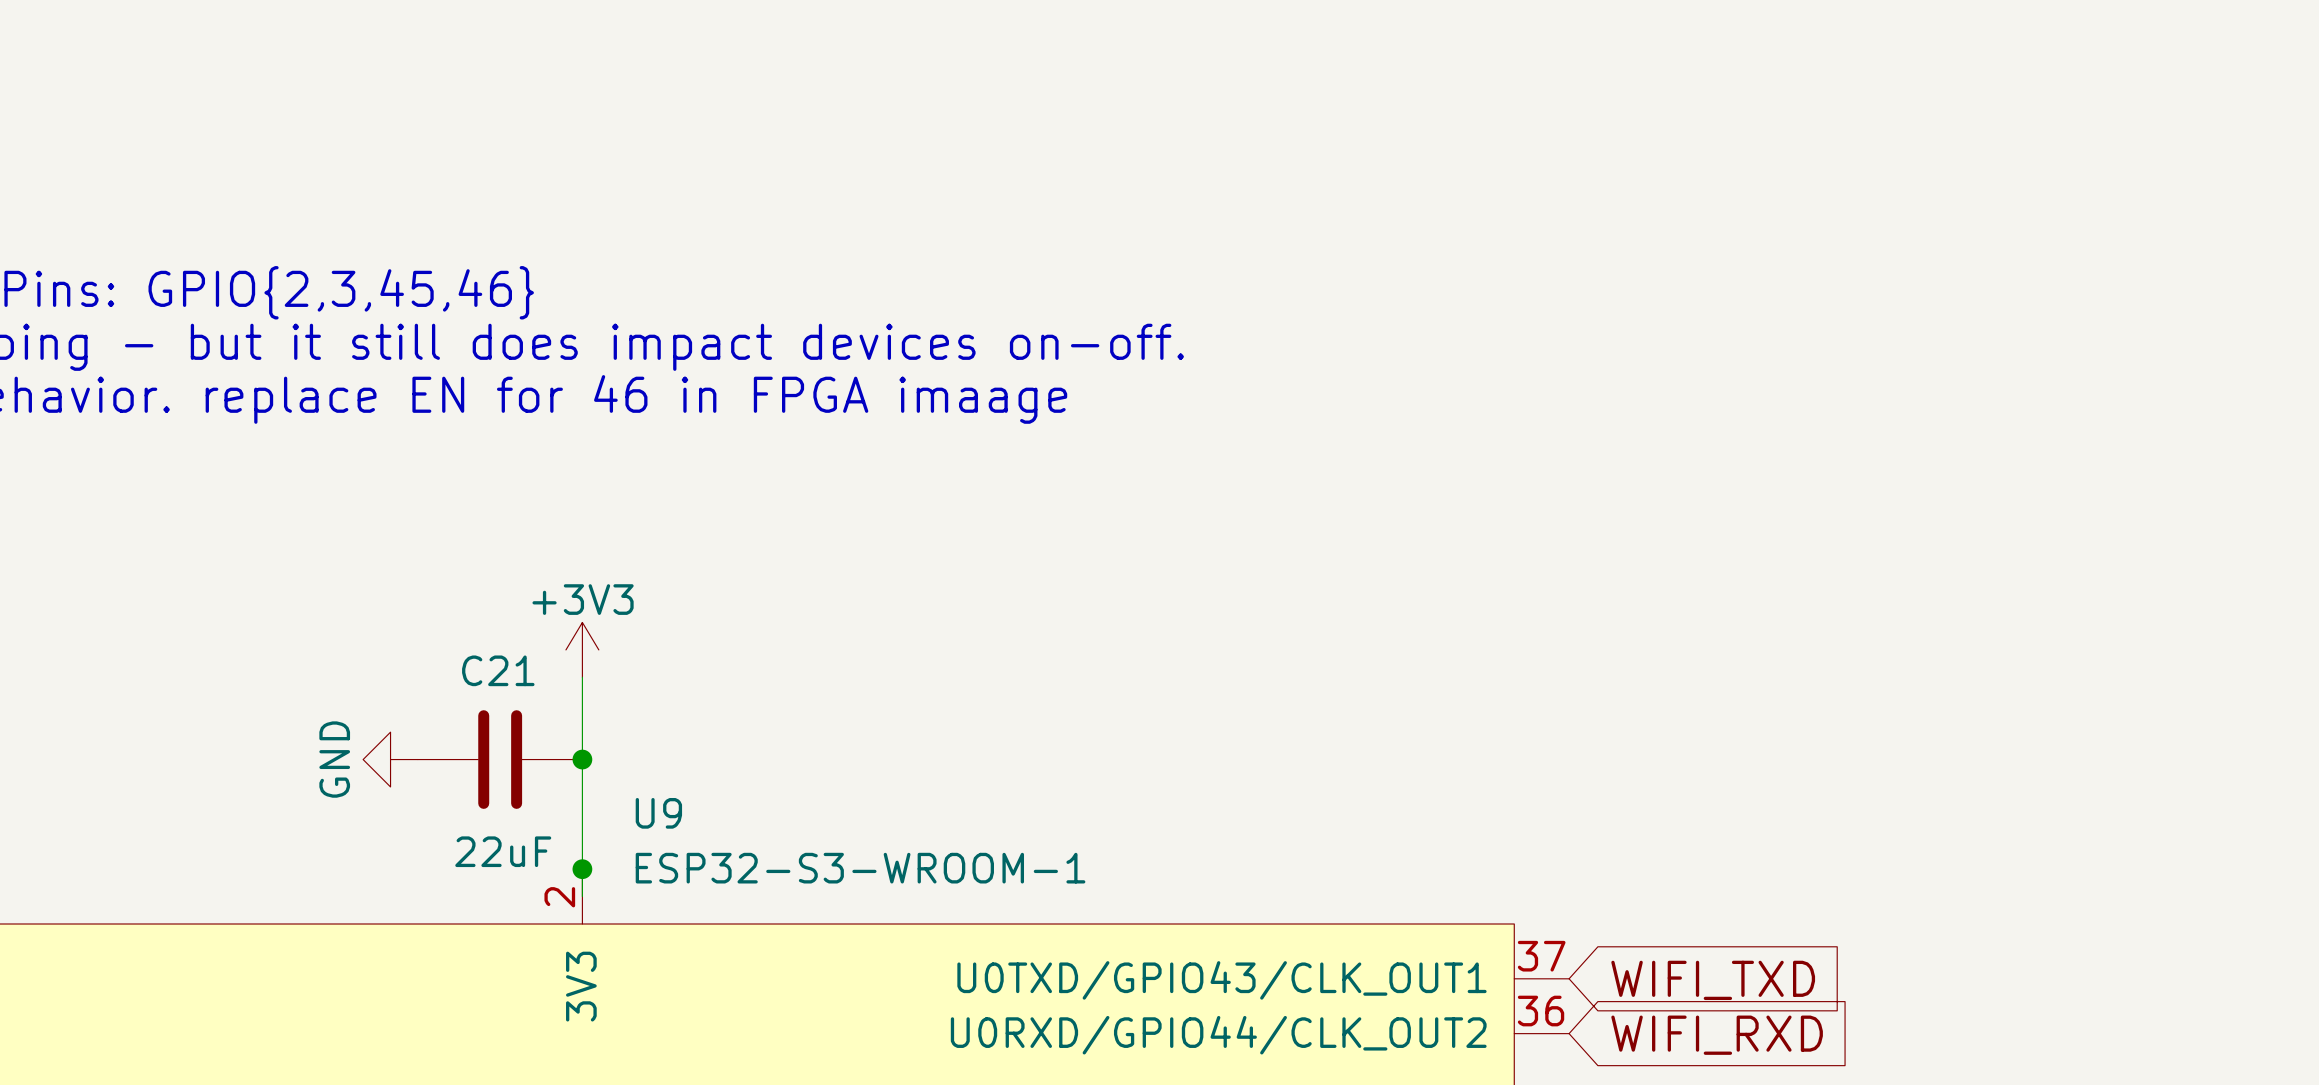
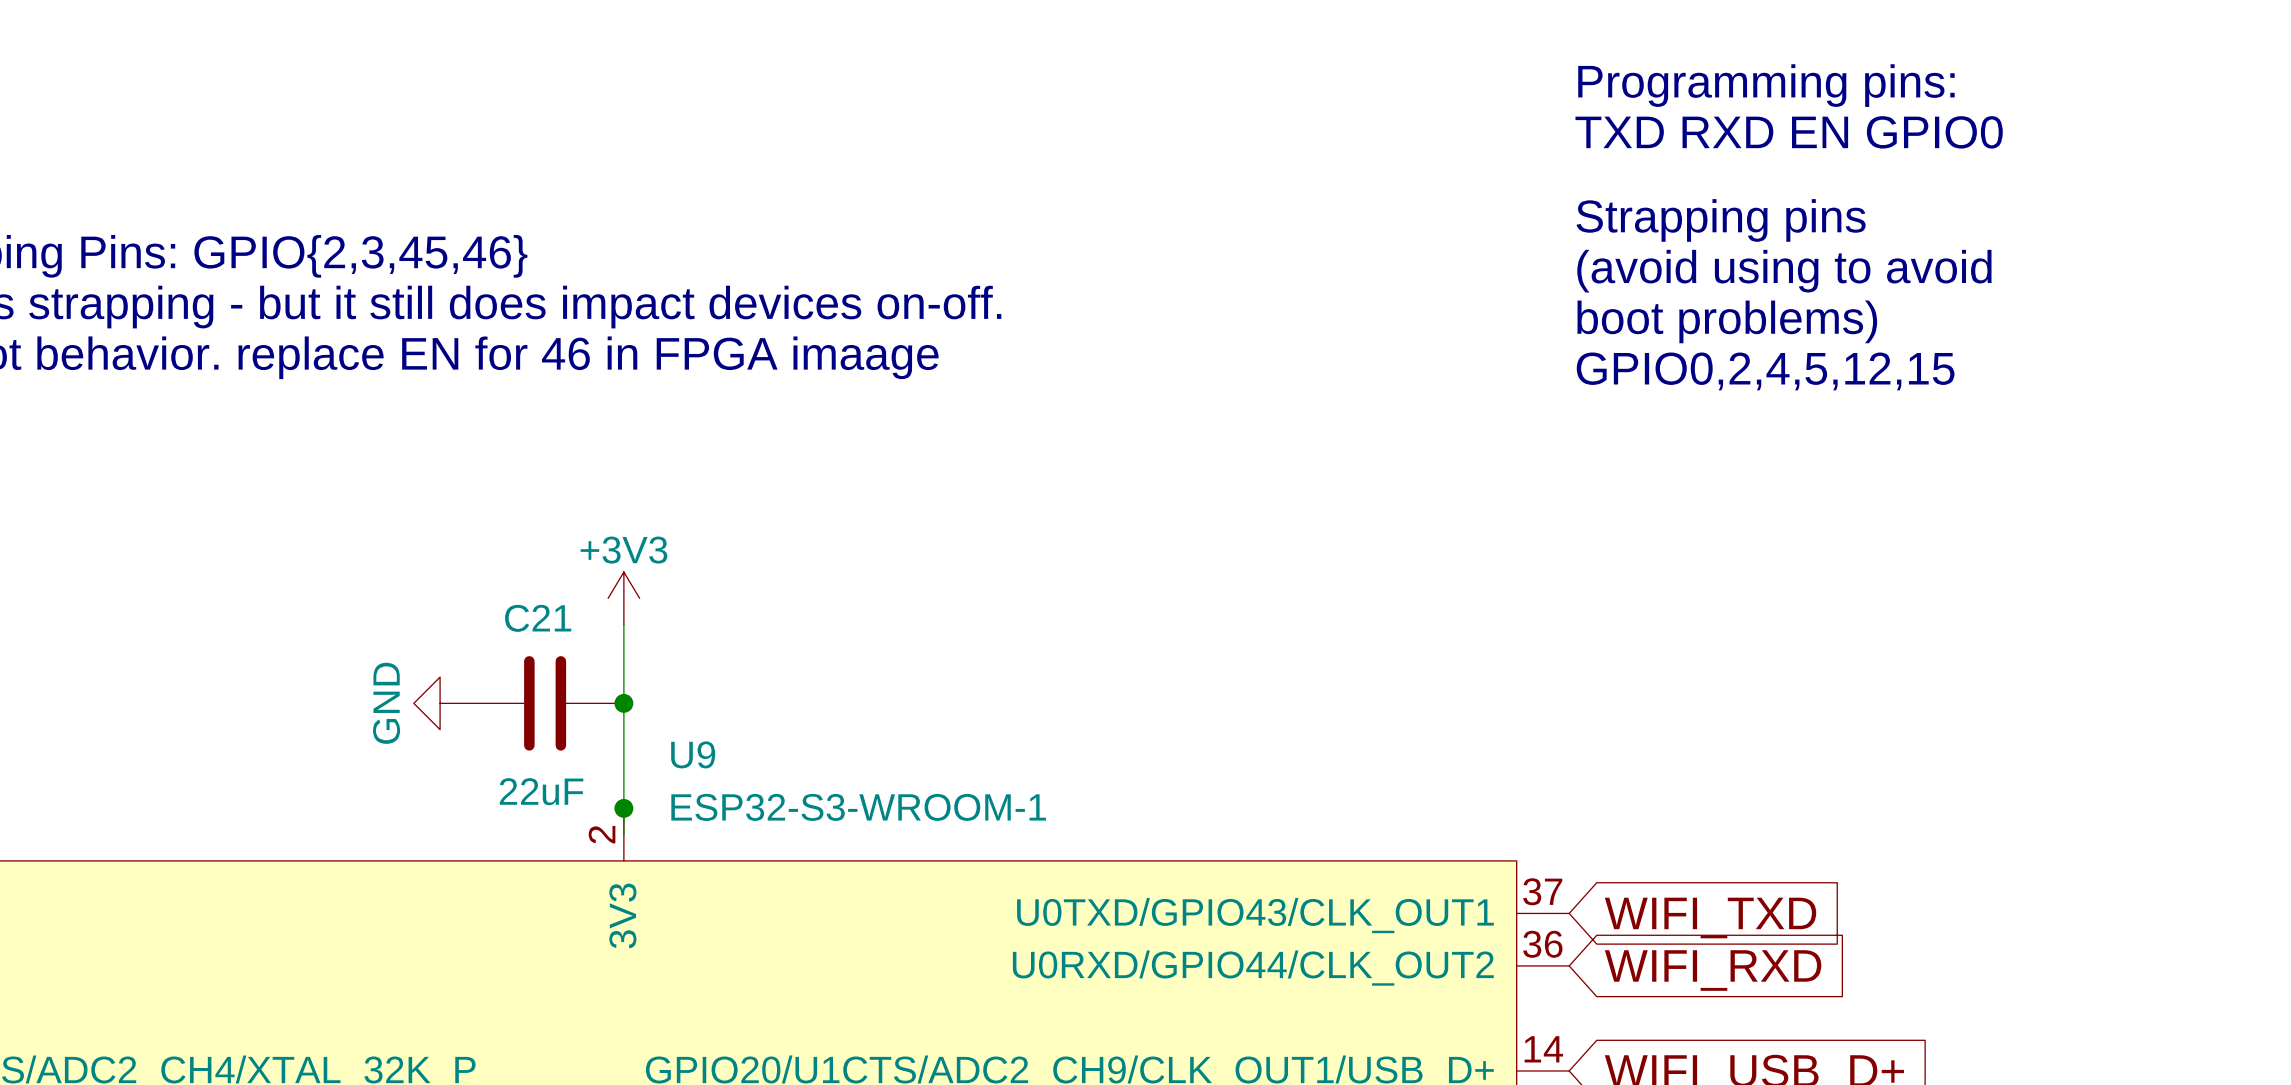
text: none -> Programming pins: (1766, 85)
text: none -> TXD RXD EN GPIO0 (1789, 132)
text: none -> Strapping pins (1721, 220)
text: none -> (avoid using to avoid (1784, 271)
text: none -> boot problems) (1727, 321)
text: none -> GPIO0,2,4,5,12,15 (1765, 371)

